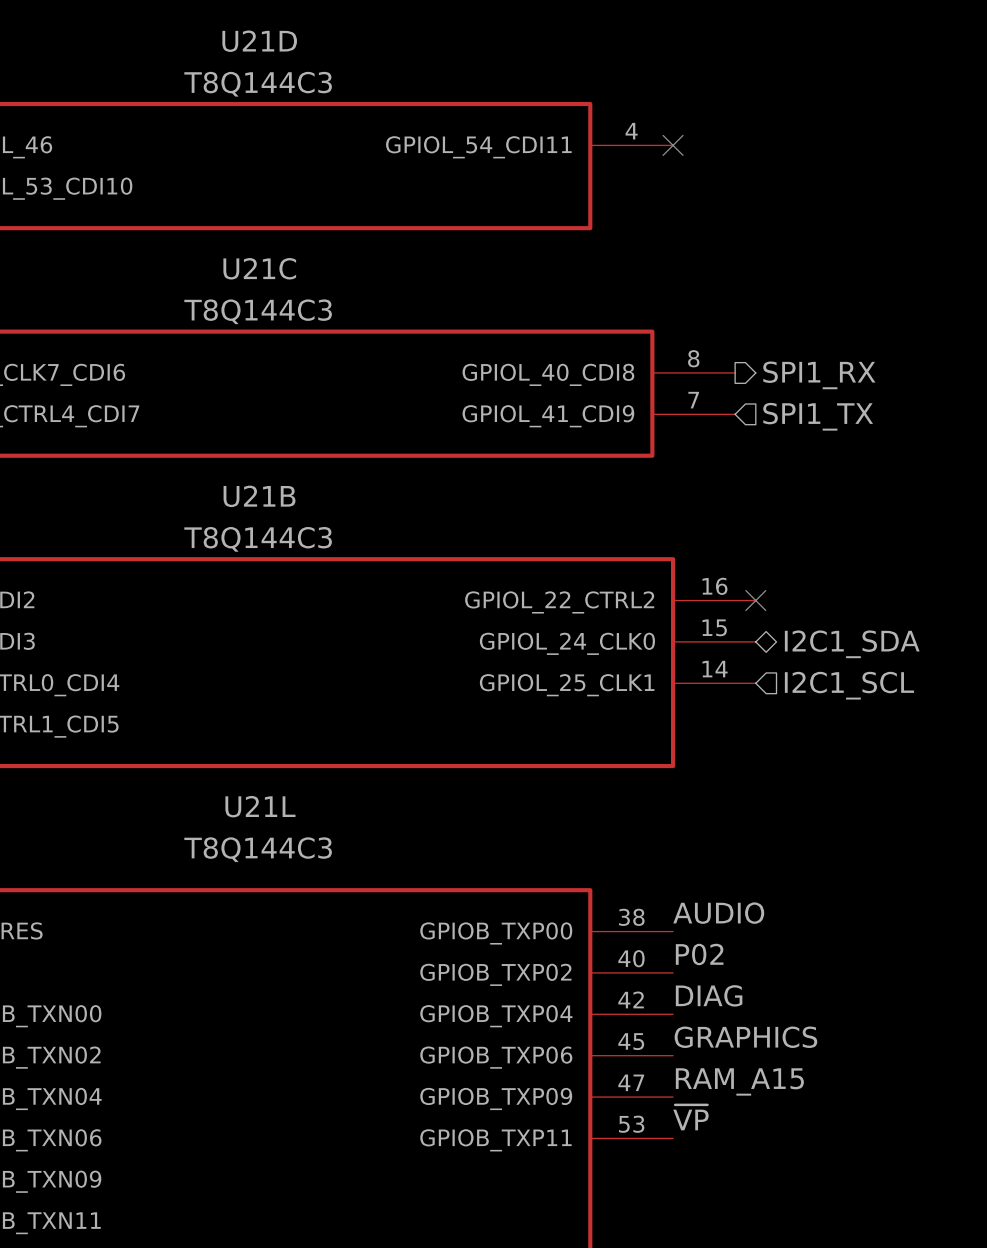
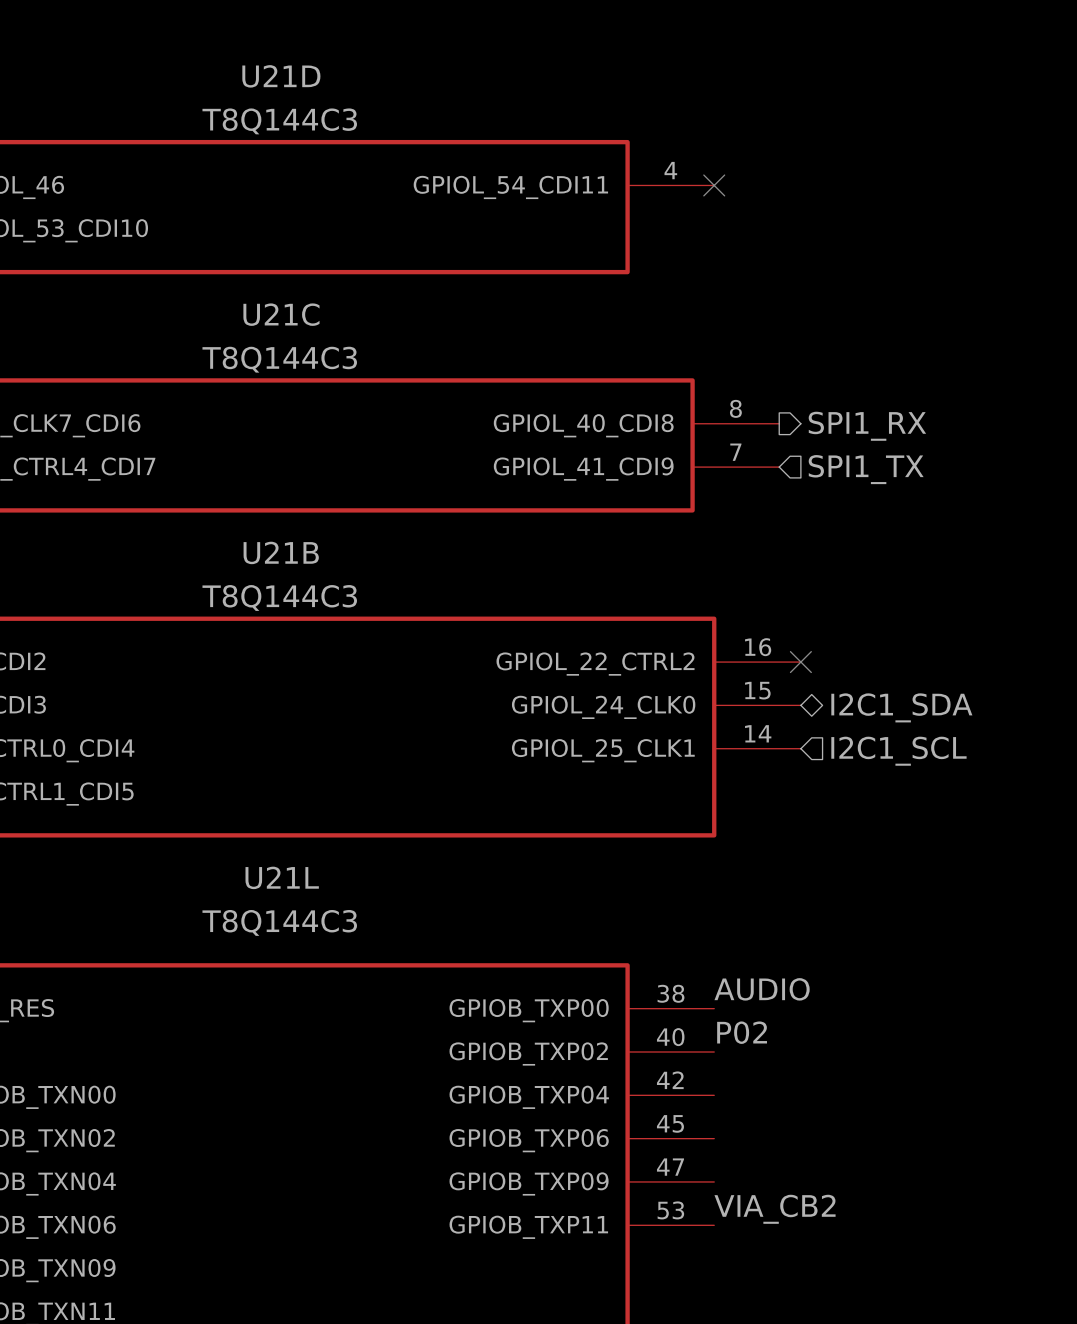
label: DIAG (709, 995) -> none
label: GRAPHICS (745, 1037) -> none
label: RAM_A15 (739, 1081) -> none
label: ~{VP} (690, 1117) -> VIA_CB2 (775, 1209)

